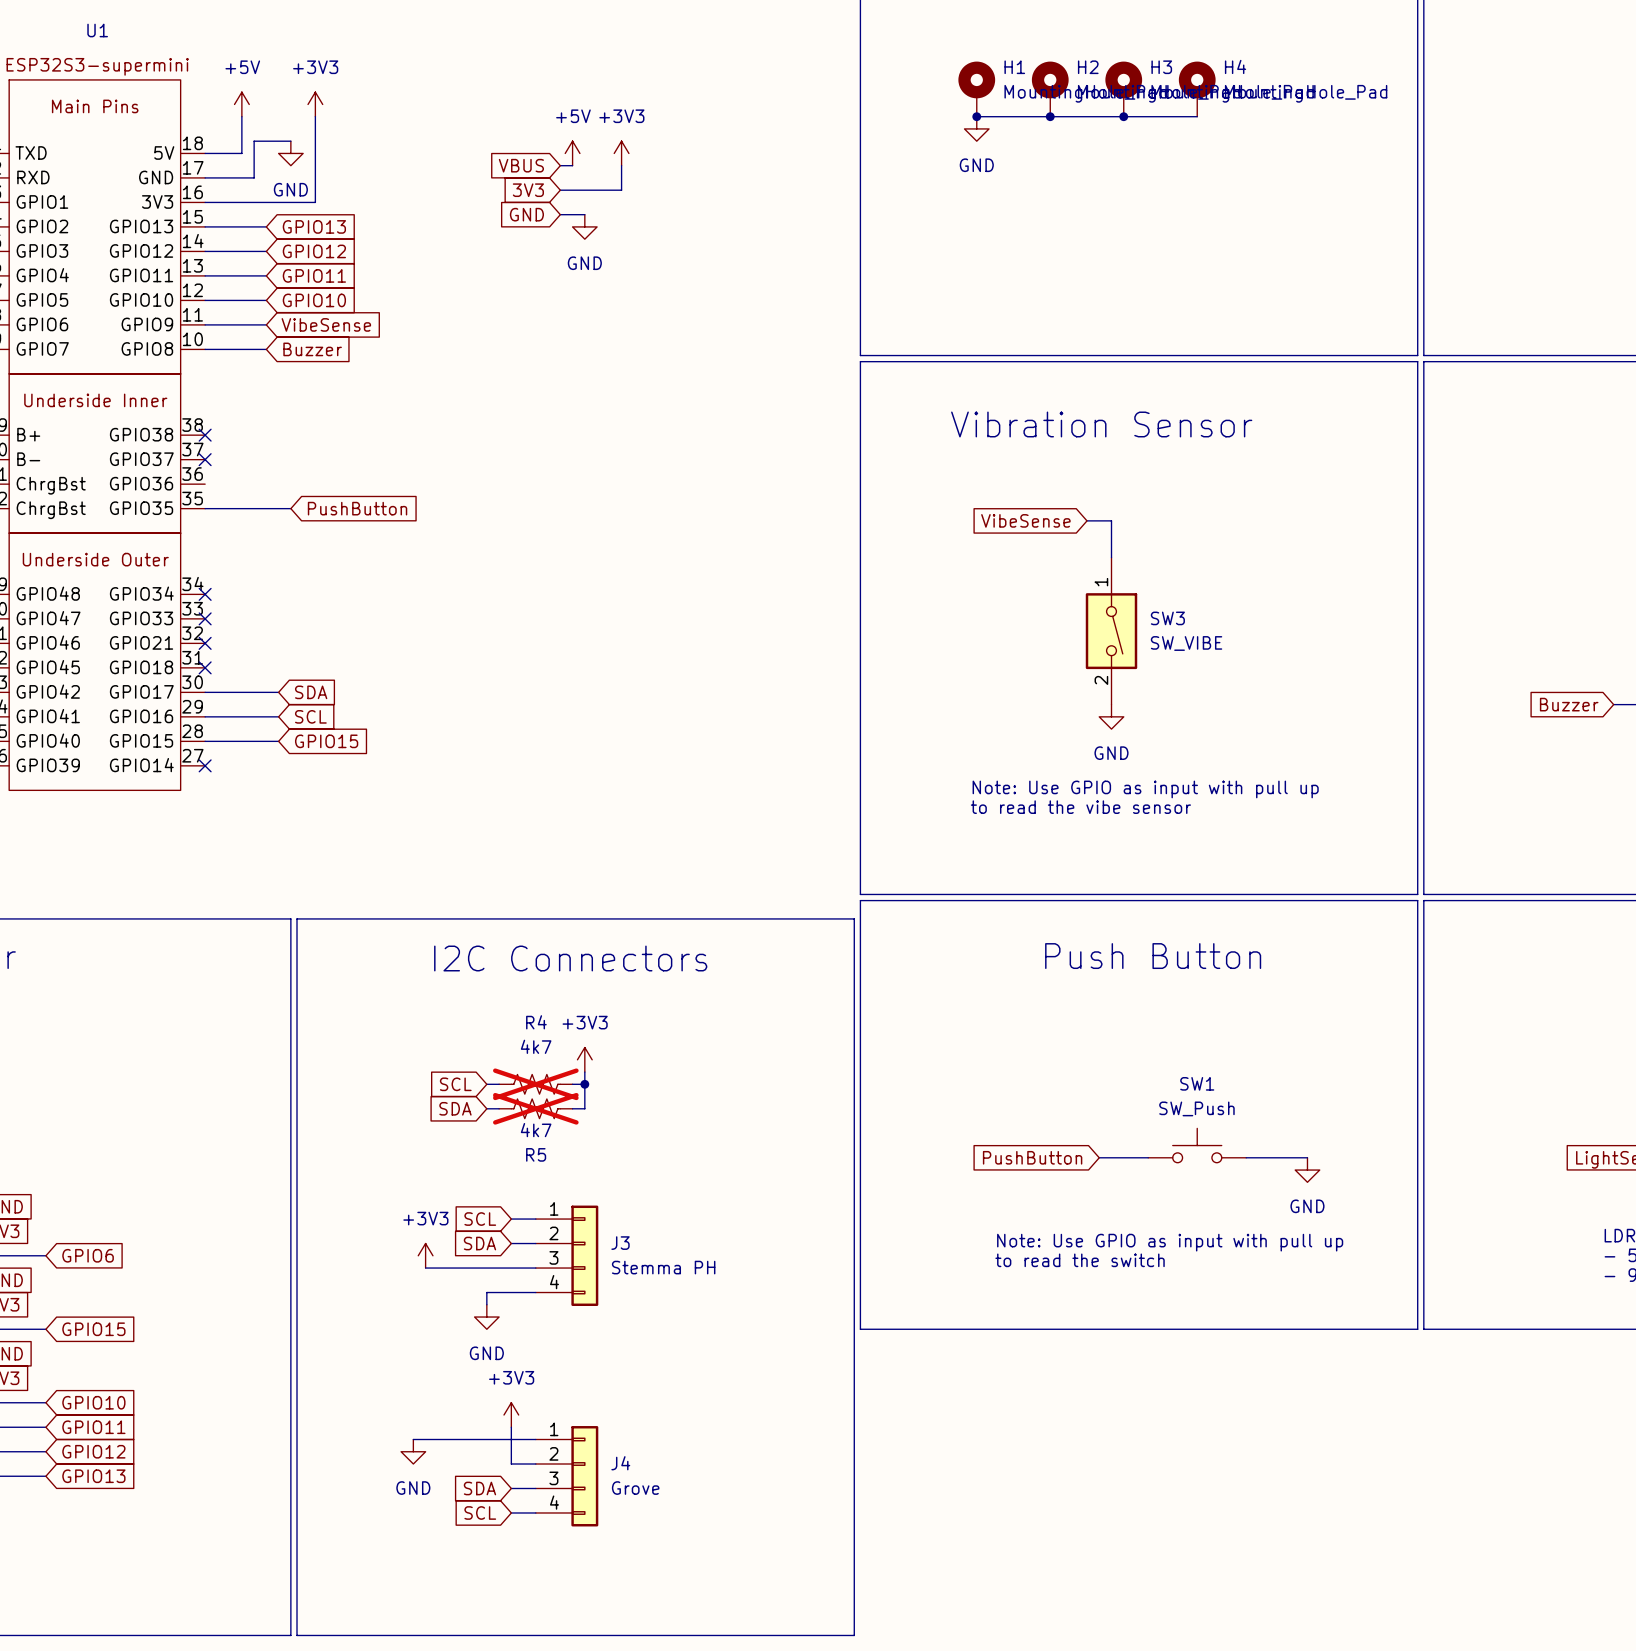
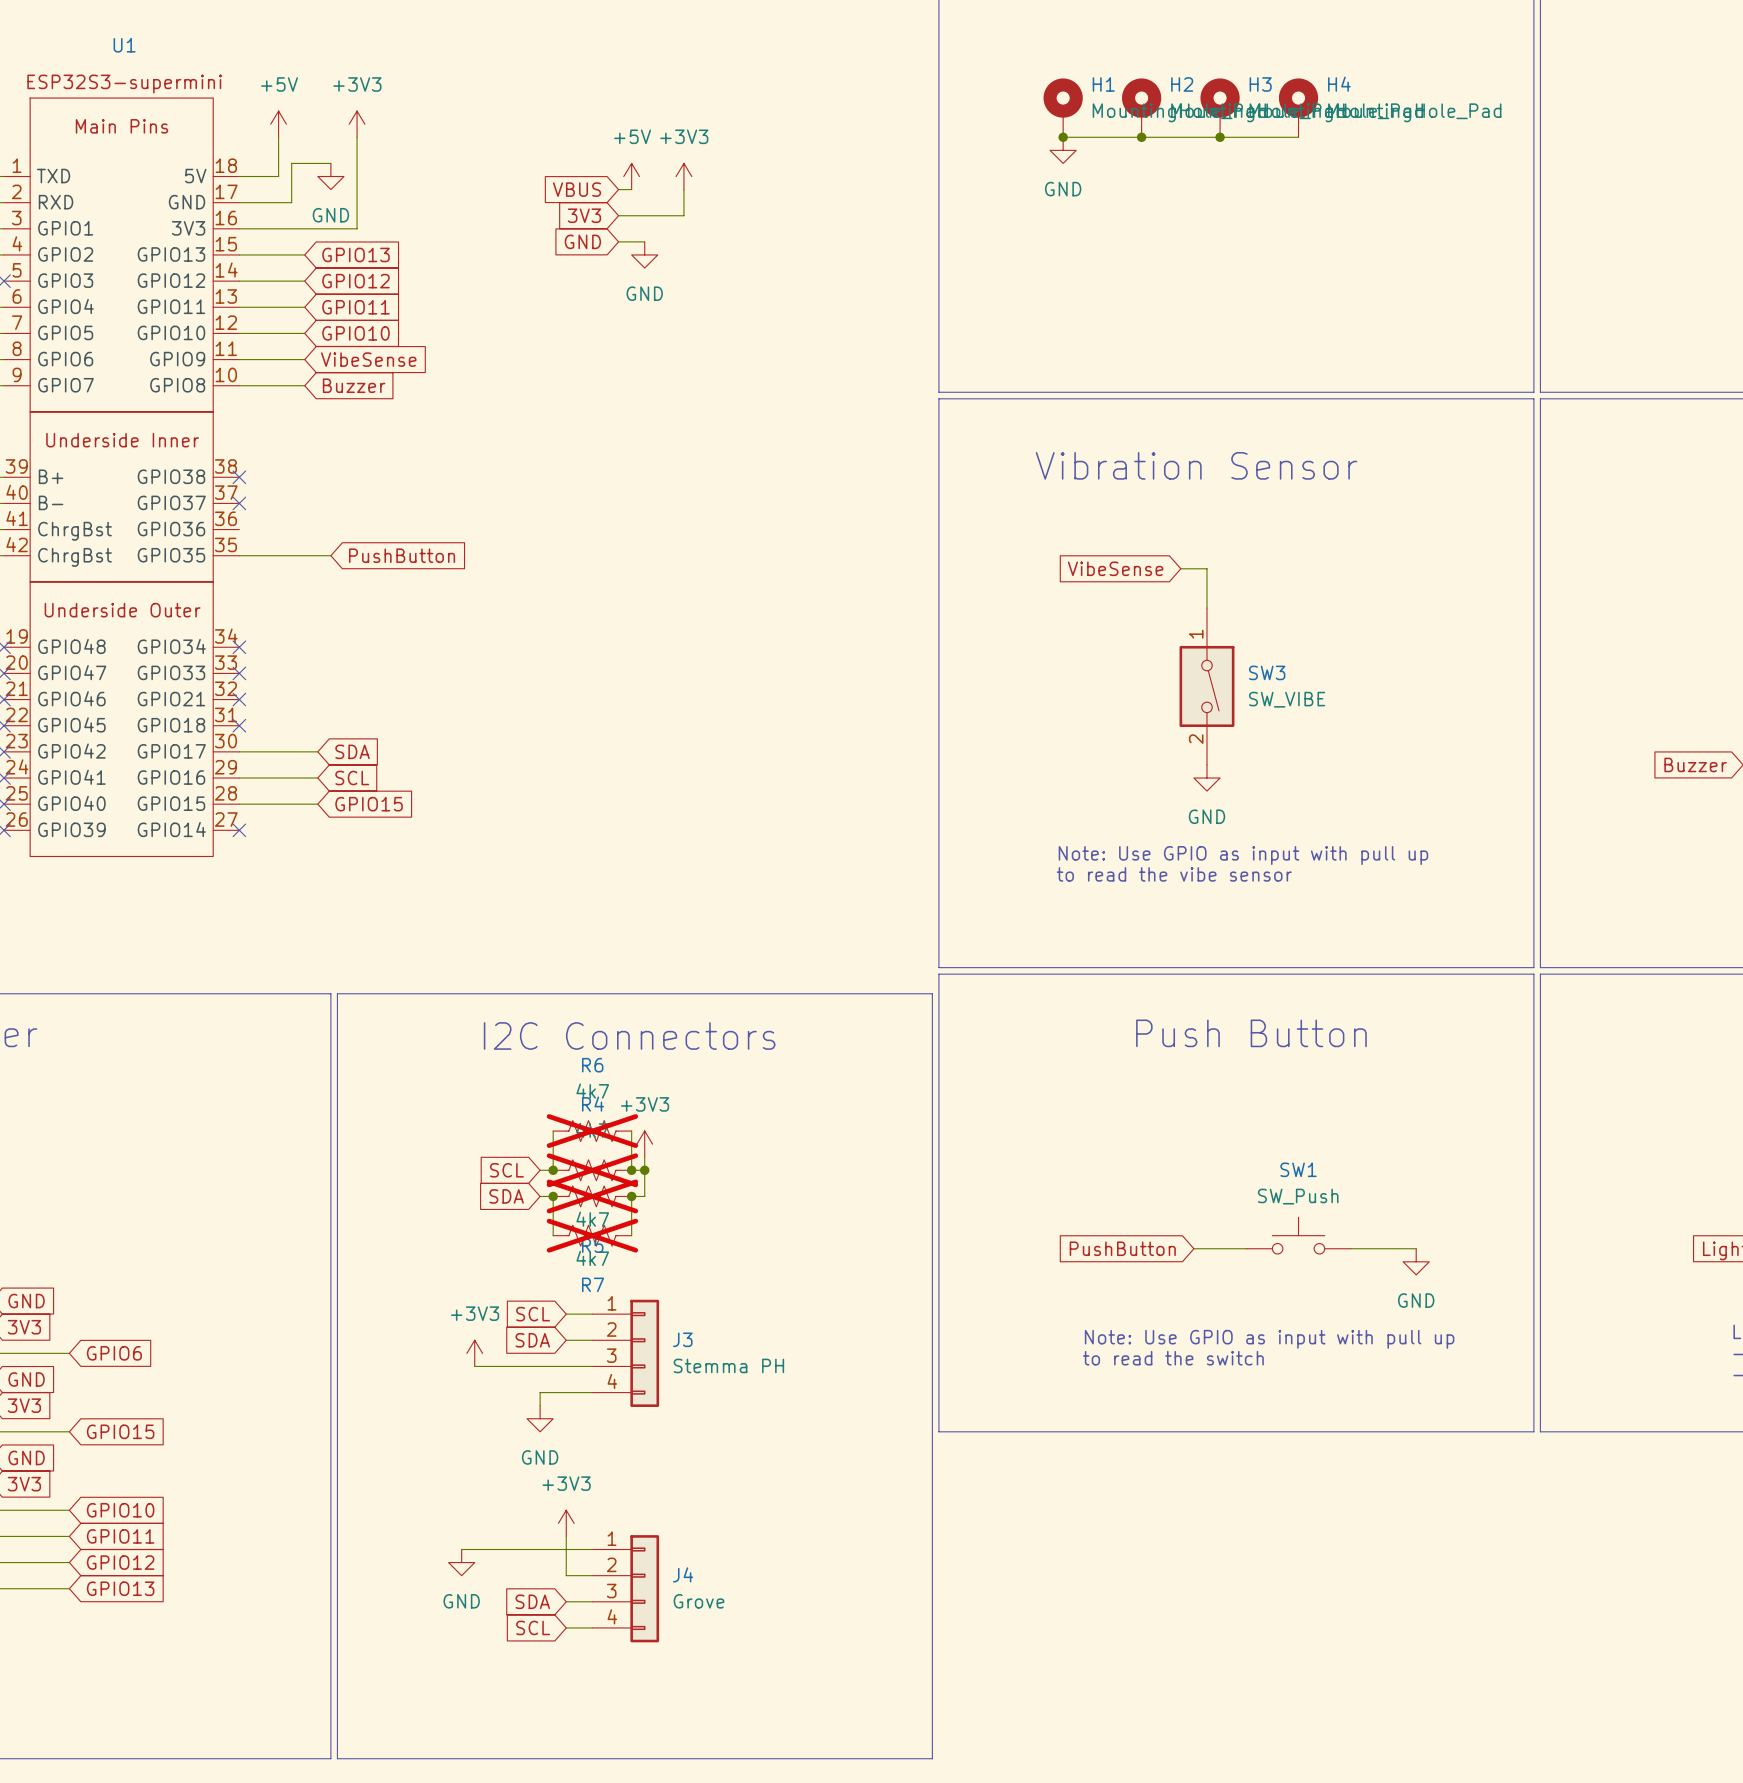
wire: none -> (553, 1131) (553, 1170)
R6: none -> 4k7 (592, 1131)
wire: none -> (631, 1131) (631, 1170)
junction: none -> (553, 1170)
junction: none -> (631, 1170)
wire: none -> (553, 1196) (553, 1235)
junction: none -> (553, 1196)
wire: none -> (631, 1196) (631, 1235)
junction: none -> (631, 1196)
R7: none -> 4k7 (592, 1235)

